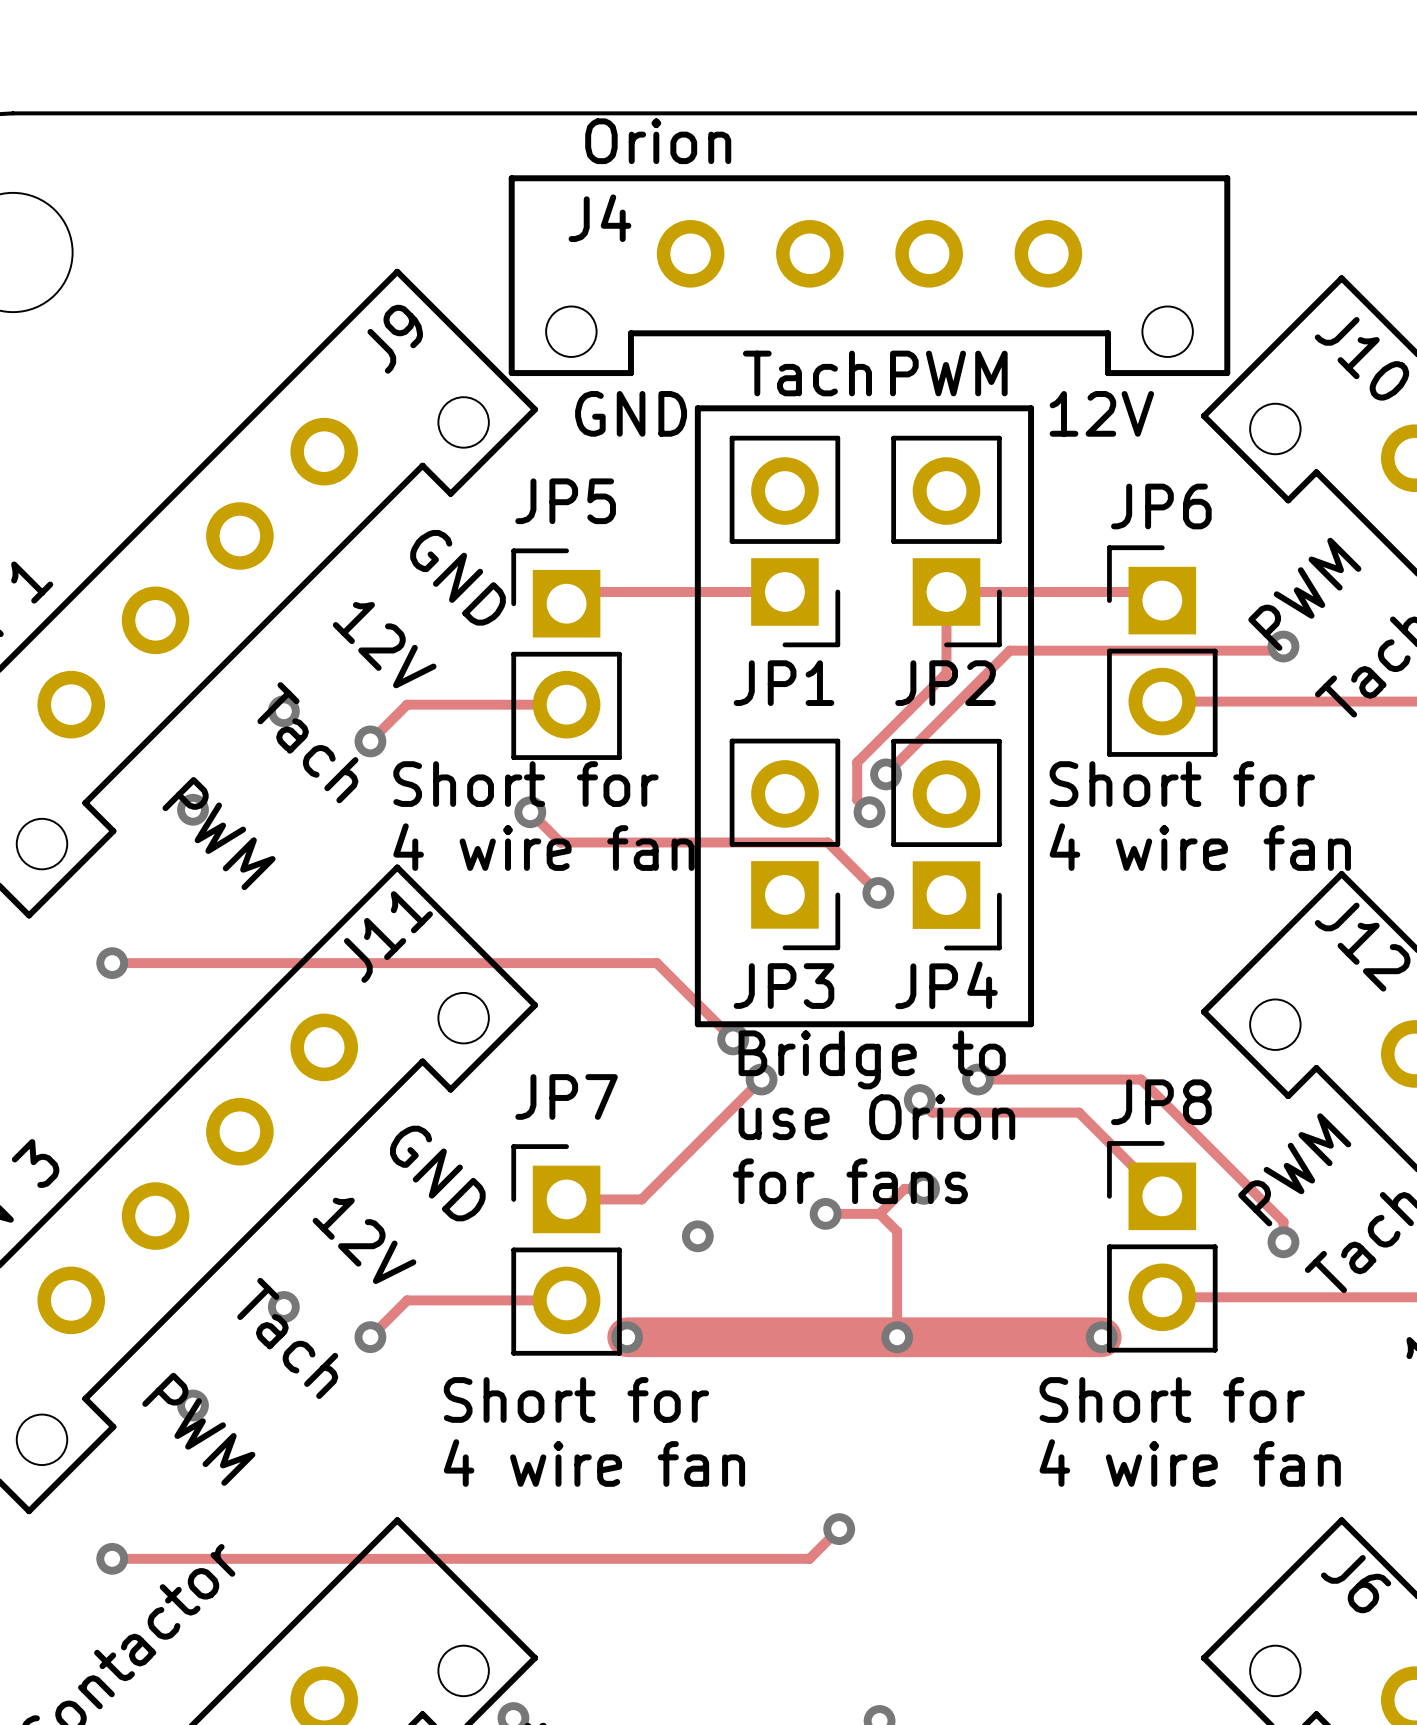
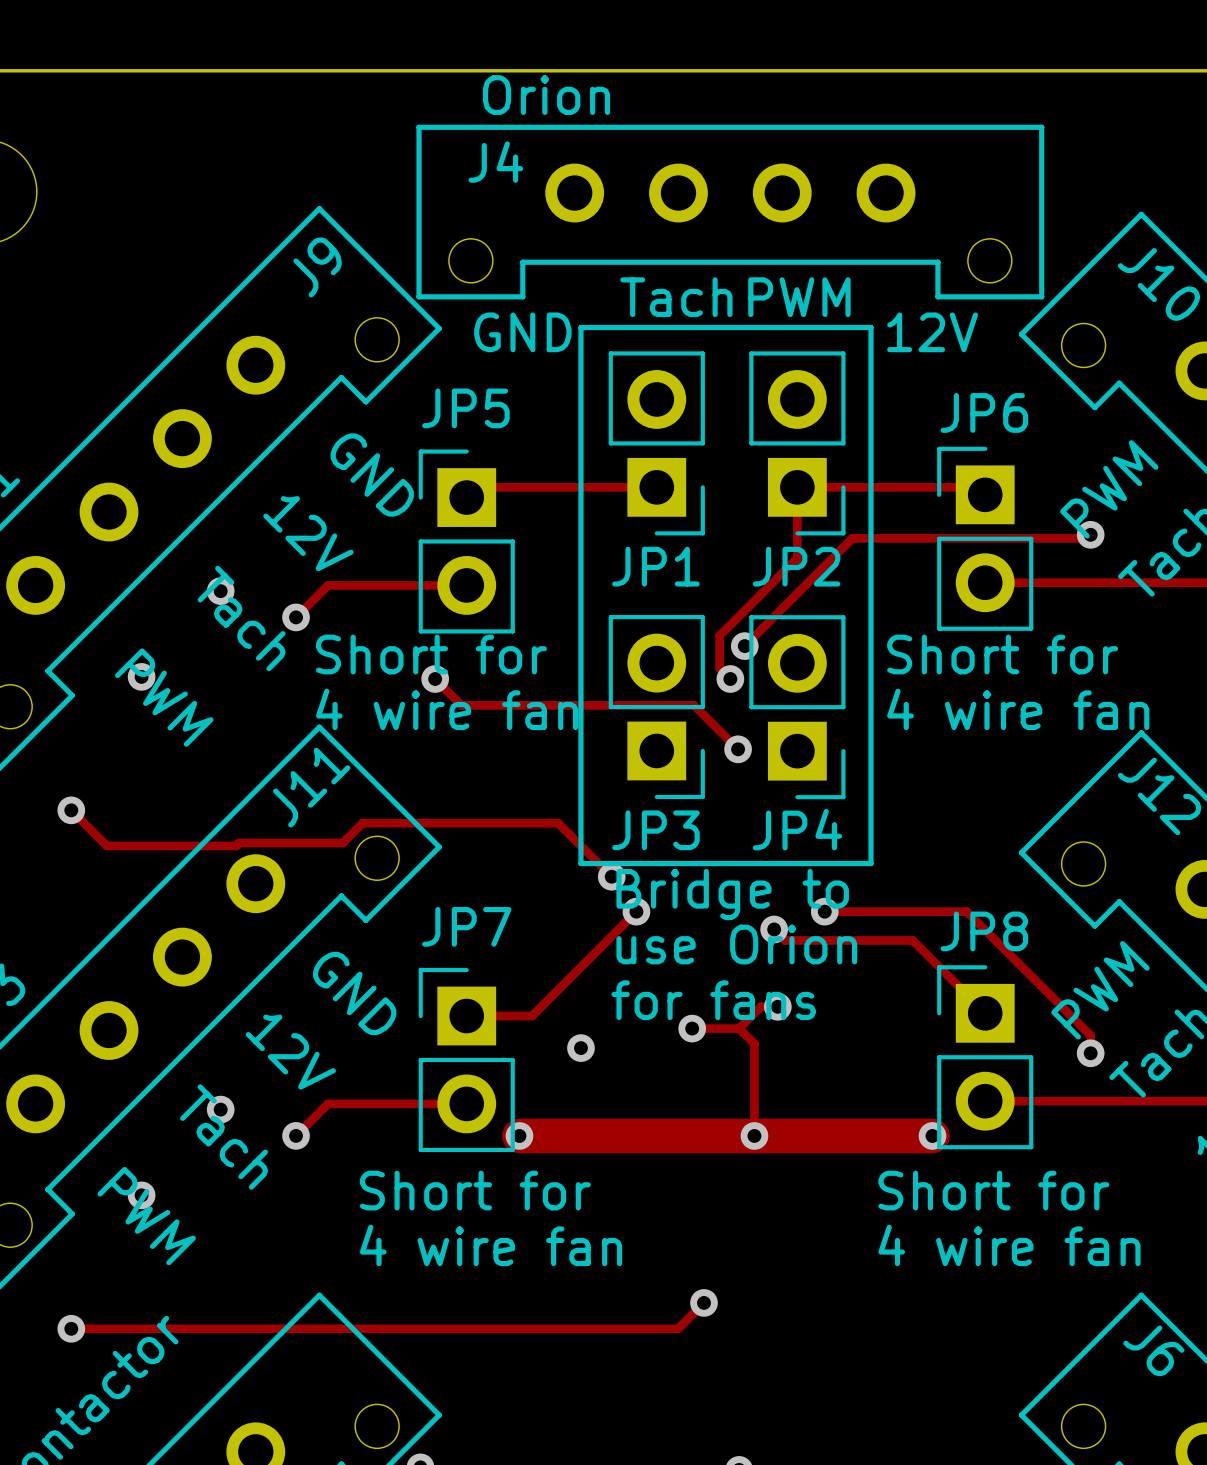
track: (112, 963) (656, 963) (671, 977) -> (71, 810) (106, 845) (236, 845) (238, 843) (342, 843) (362, 823) (558, 823)

